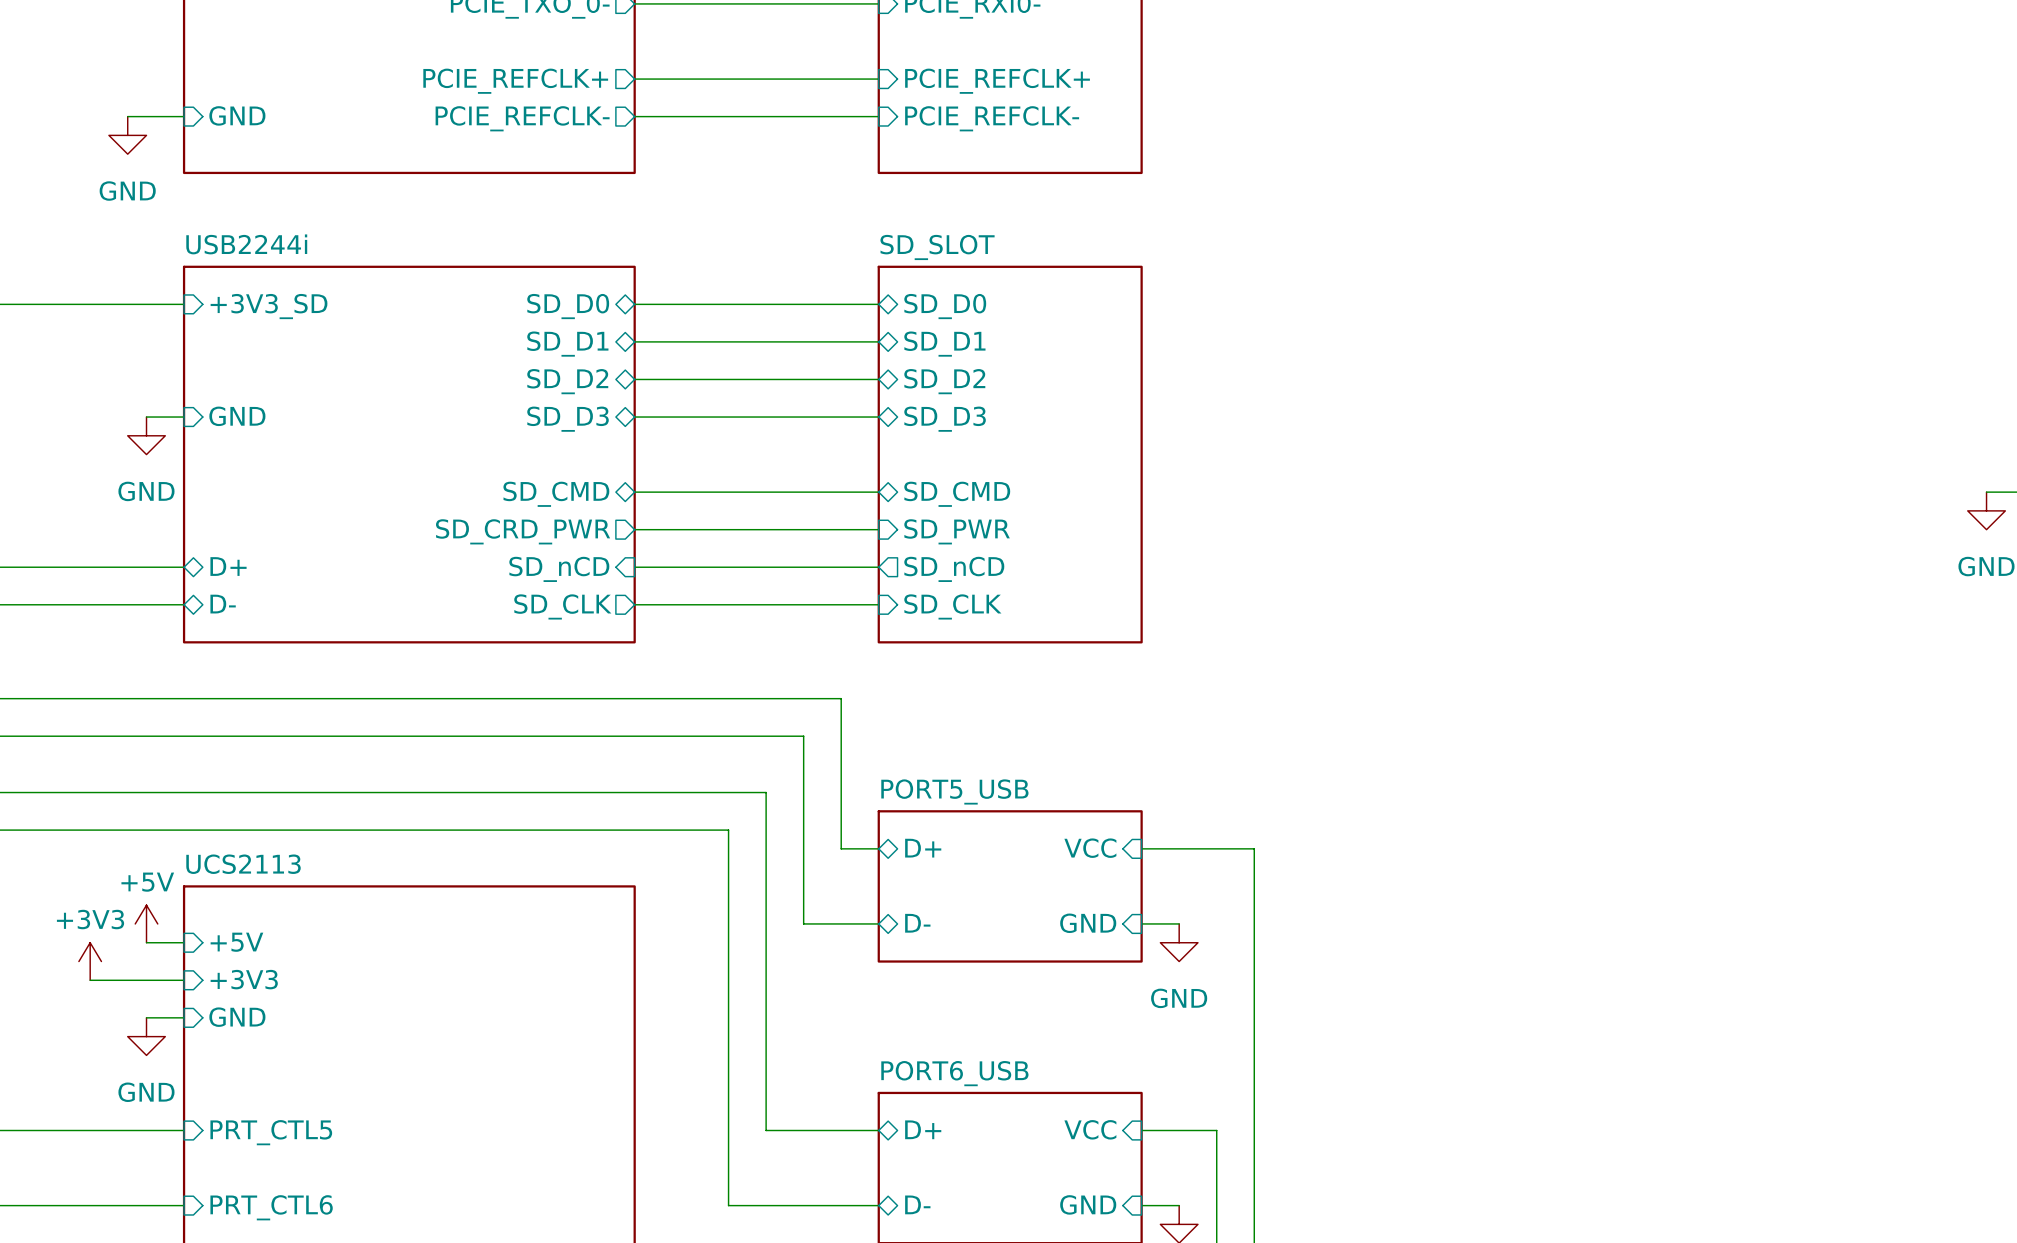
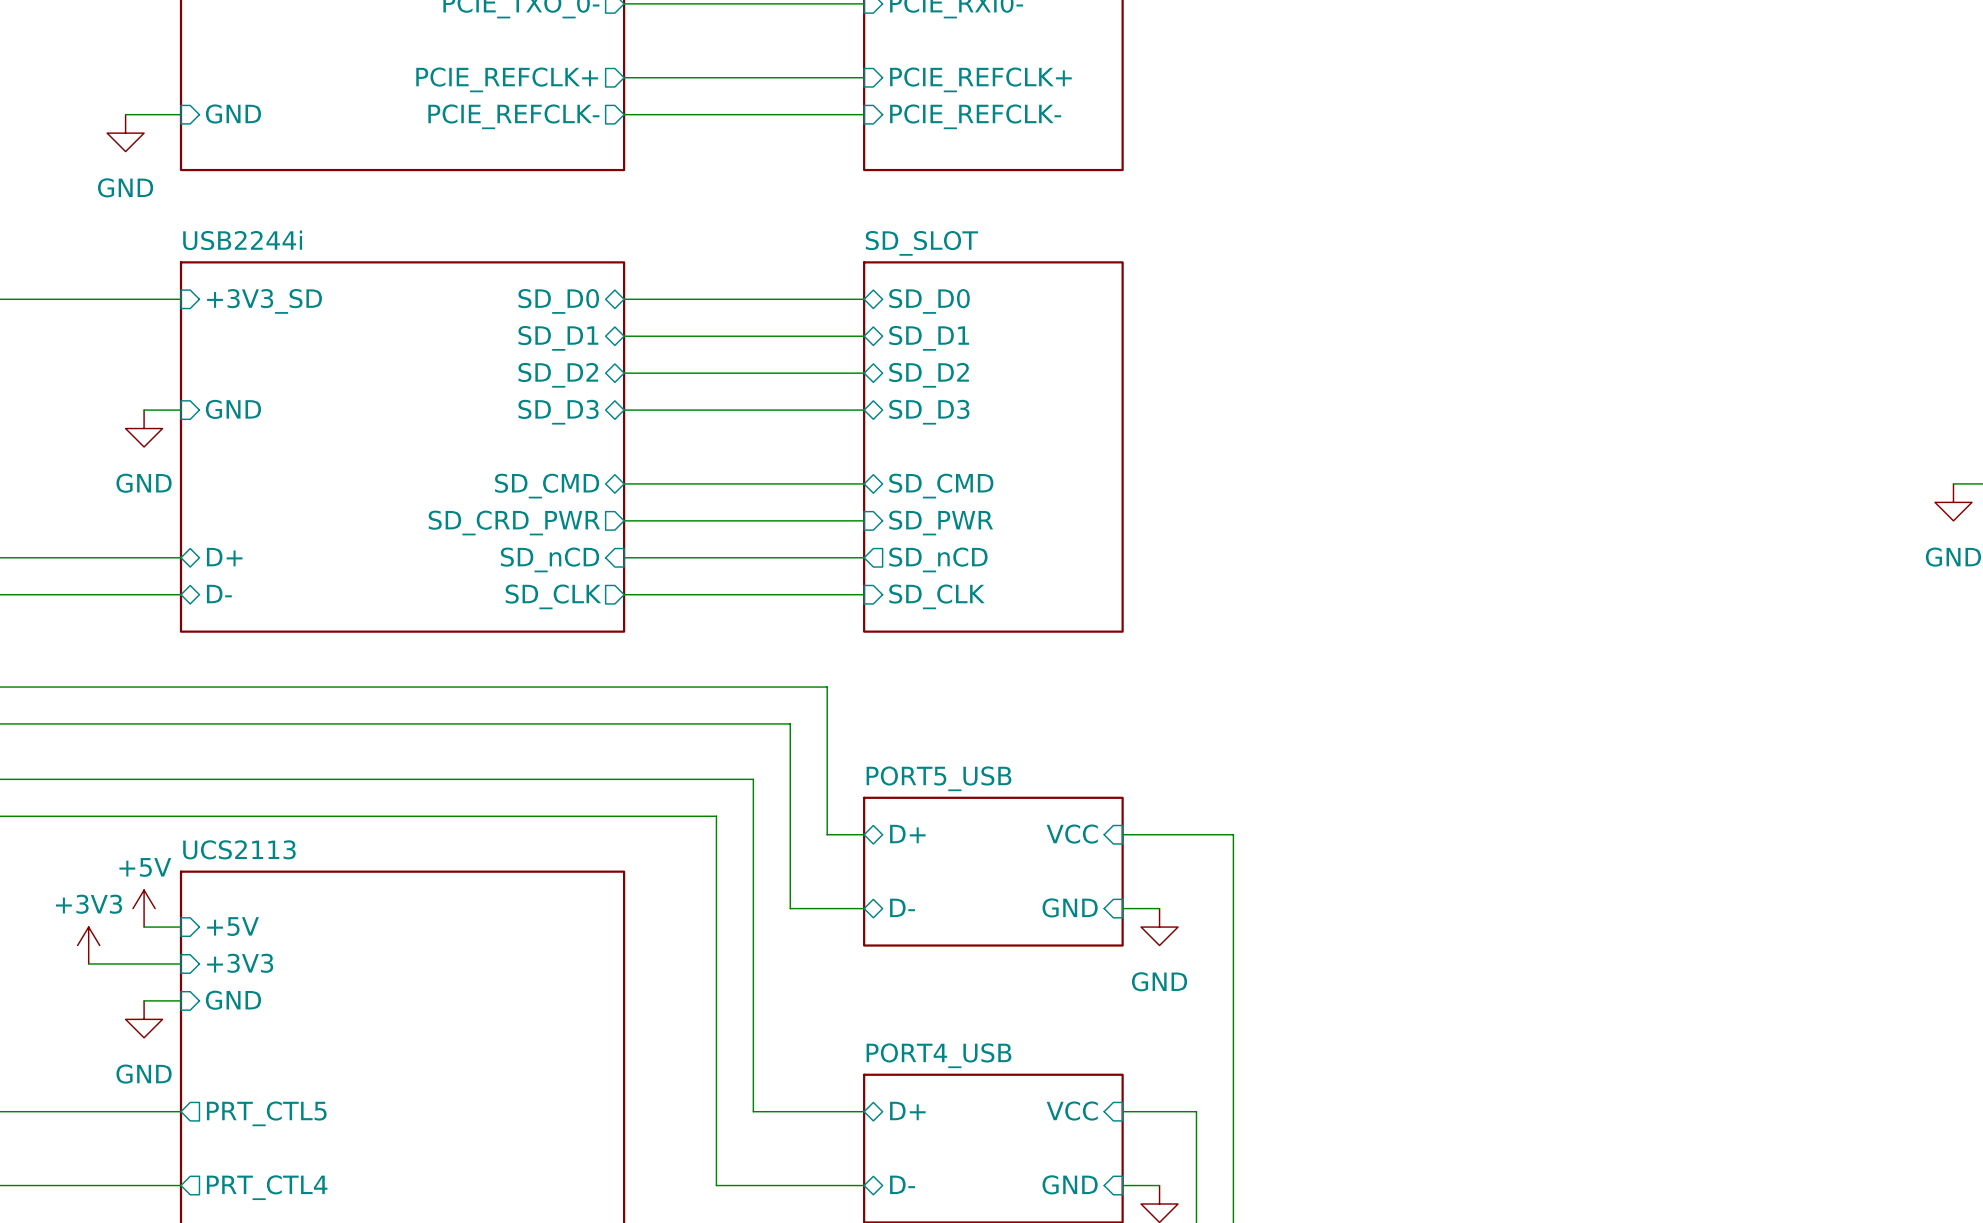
sheet PORT6_USB name: PORT6_USB (954, 1073) -> PORT4_USB (939, 1055)
sheet pin shape: input (271, 1132) -> output (266, 1113)
sheet pin shape: input (271, 1207) -> output (267, 1187)
sheet pin: PRT_CTL6 (271, 1207) -> PRT_CTL4 (267, 1187)

